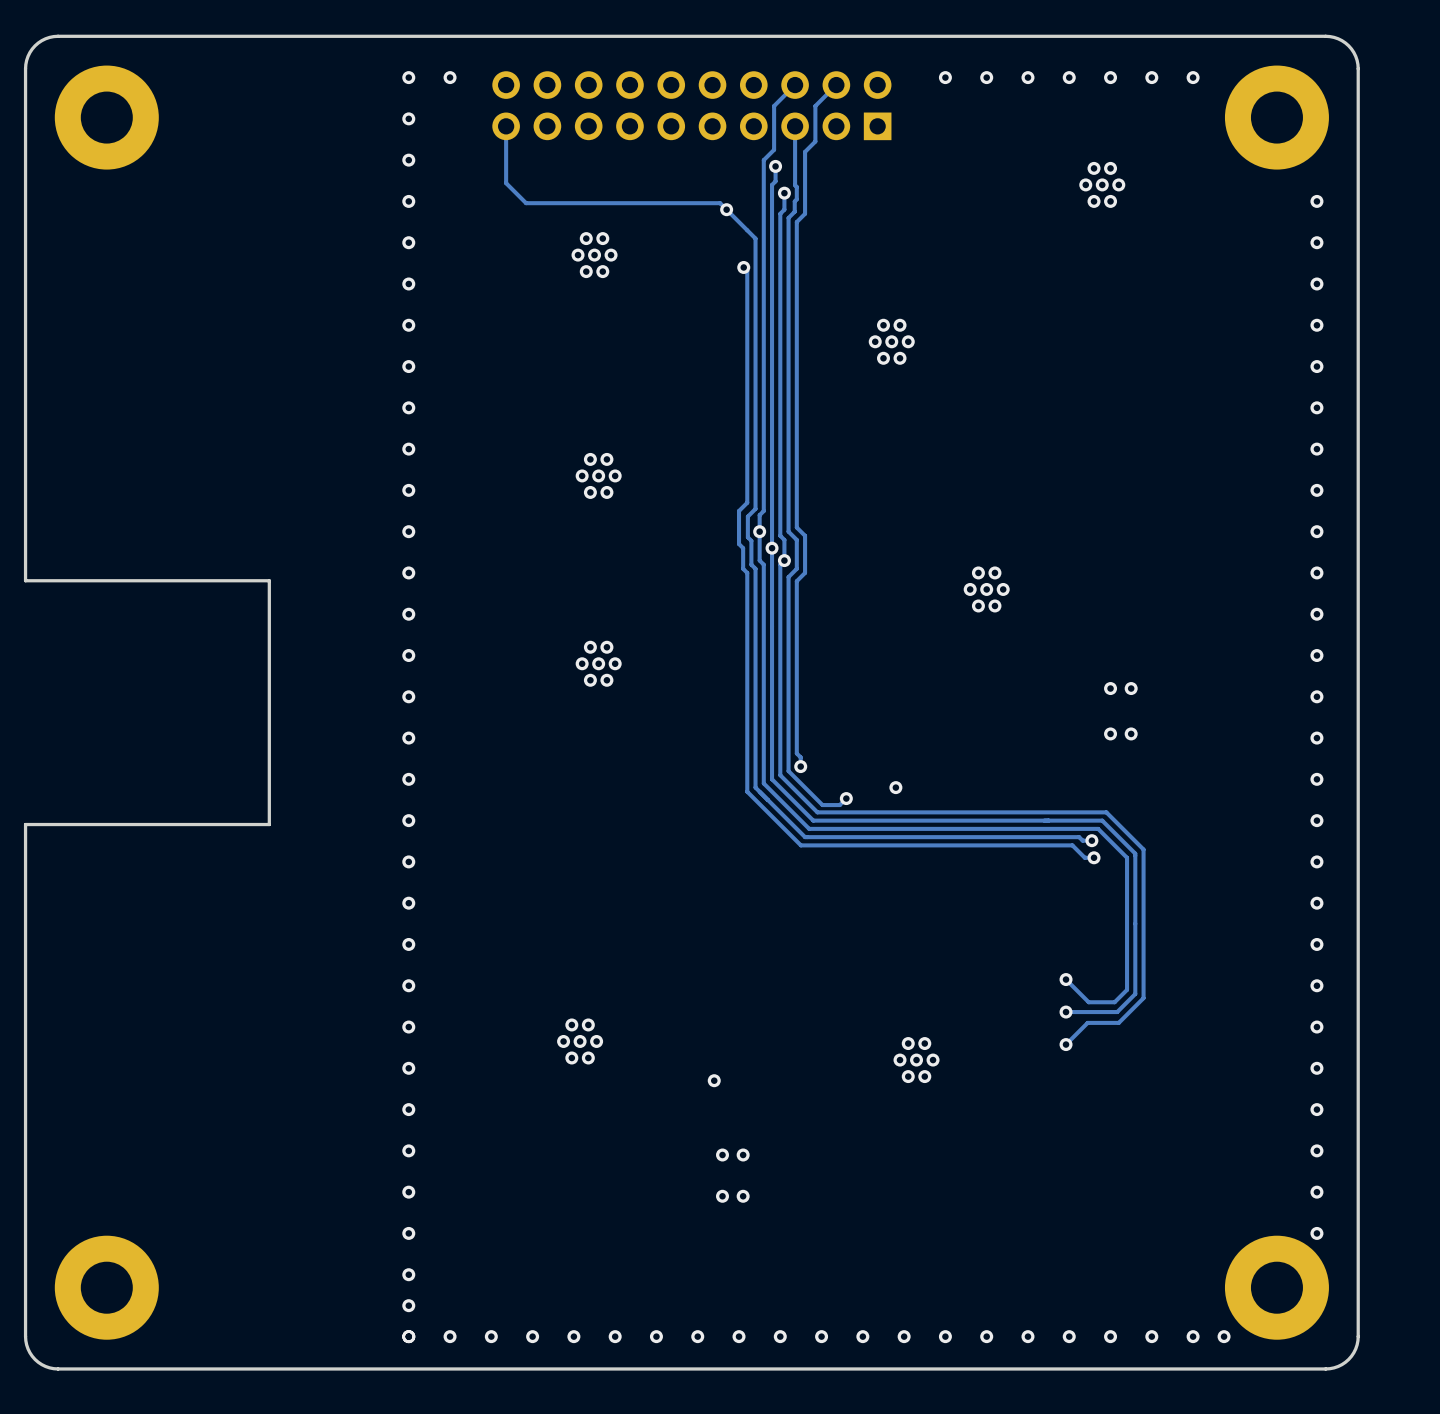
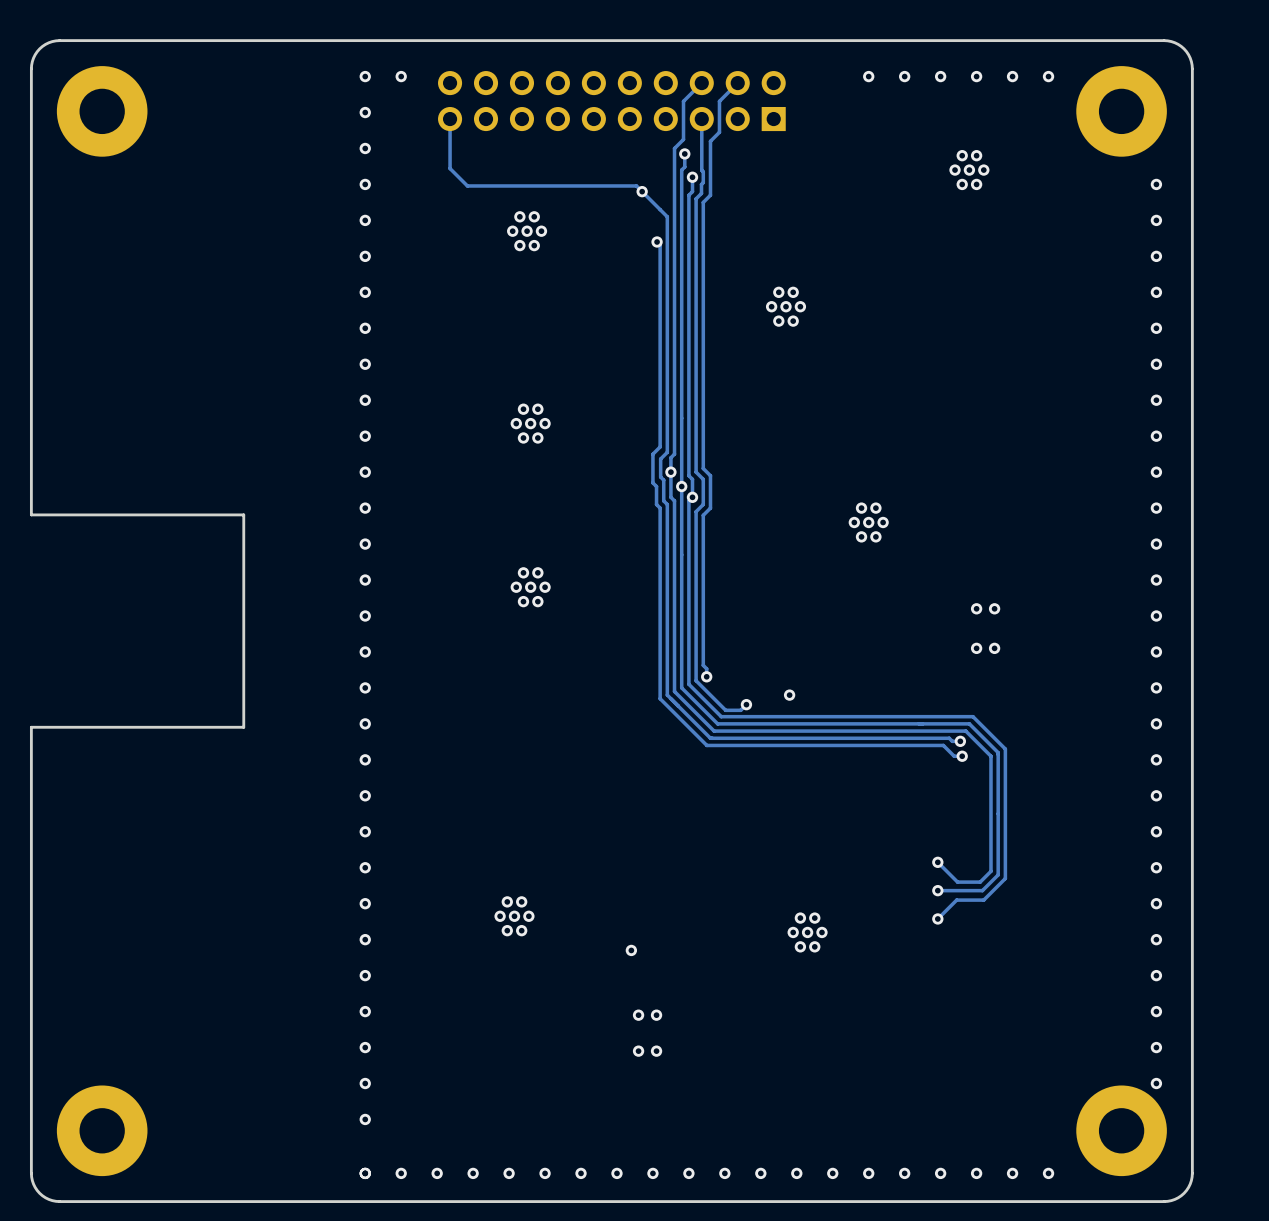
via: (945, 77) -> none
via: (408, 1305) -> none
via: (1224, 1336) -> none

